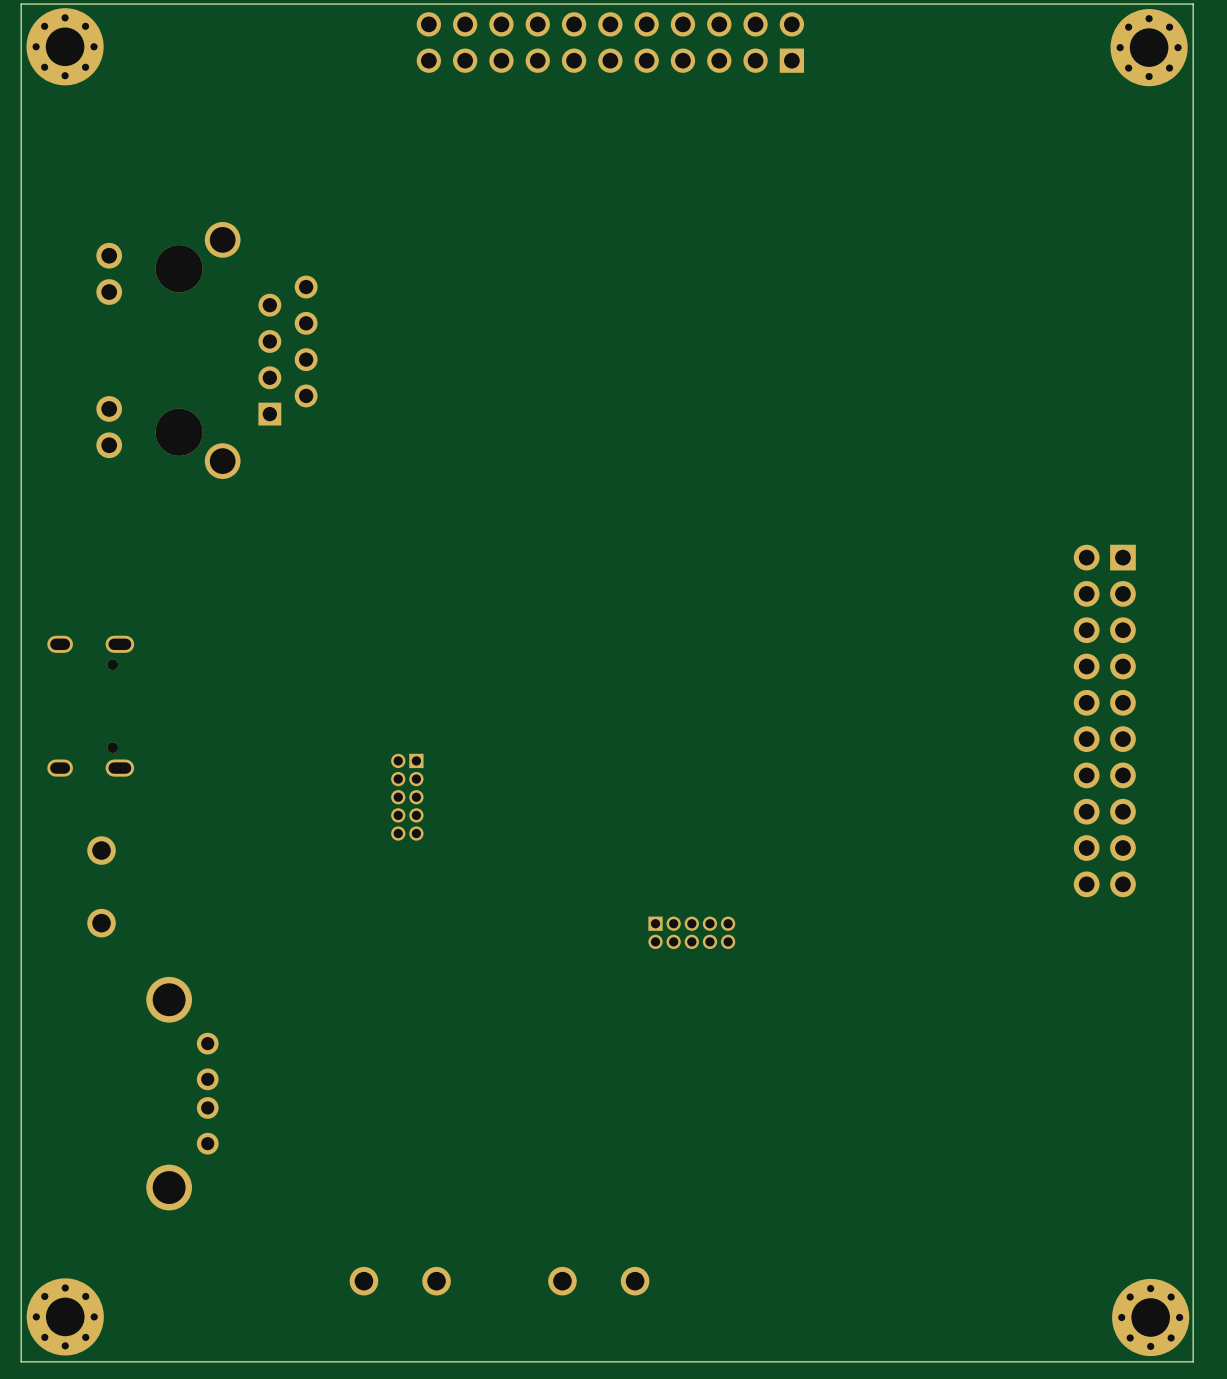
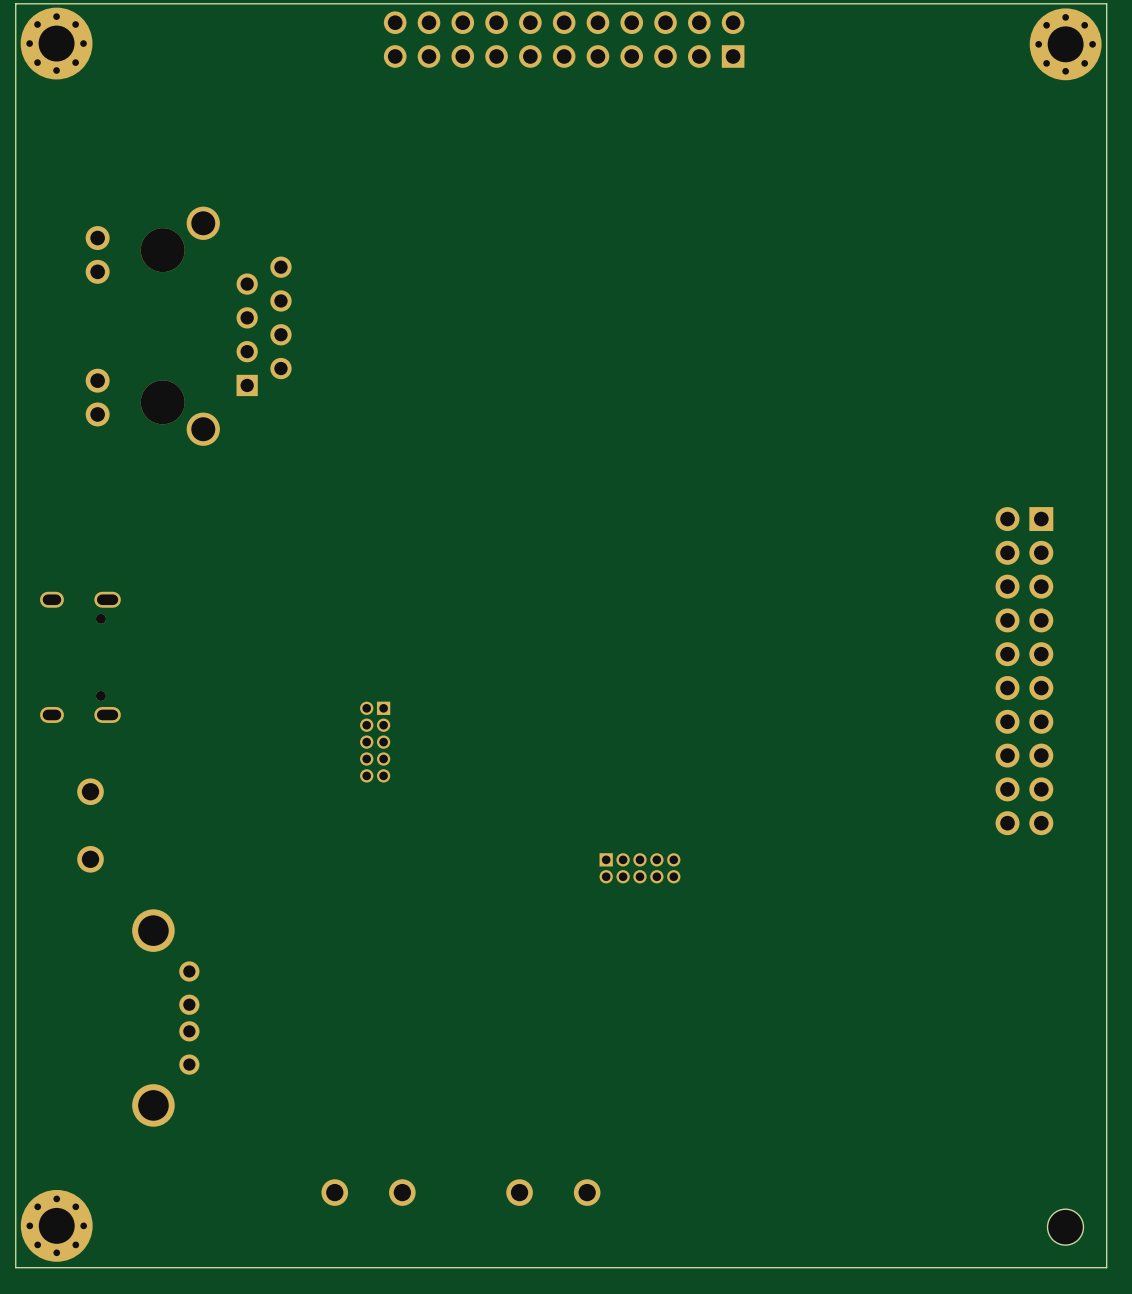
part footprint: [1112, 1278, 1190, 1357] -> [1047, 1209, 1084, 1246]

